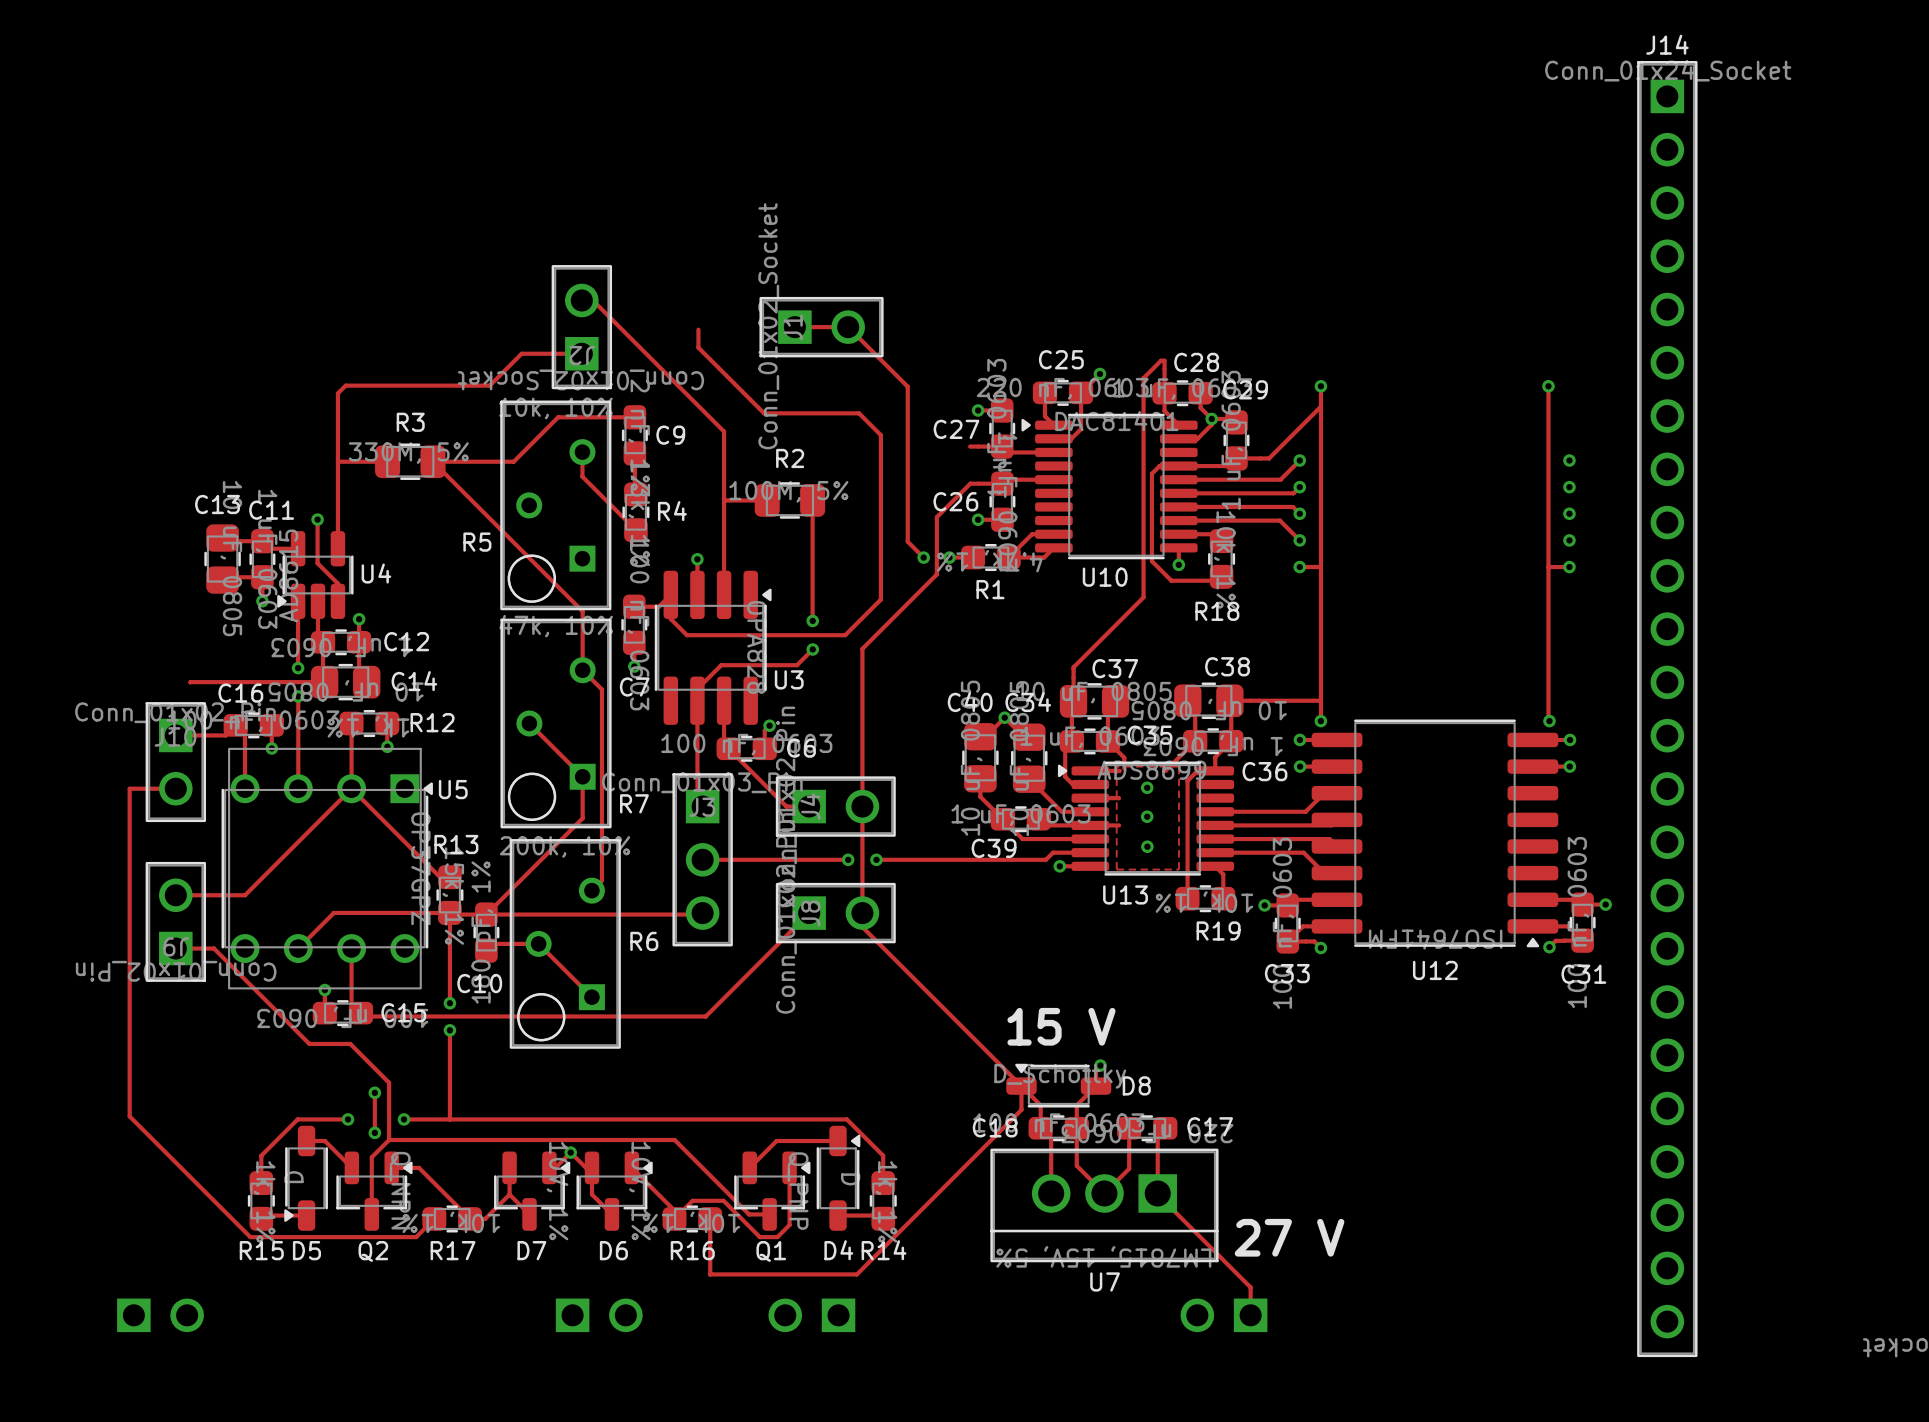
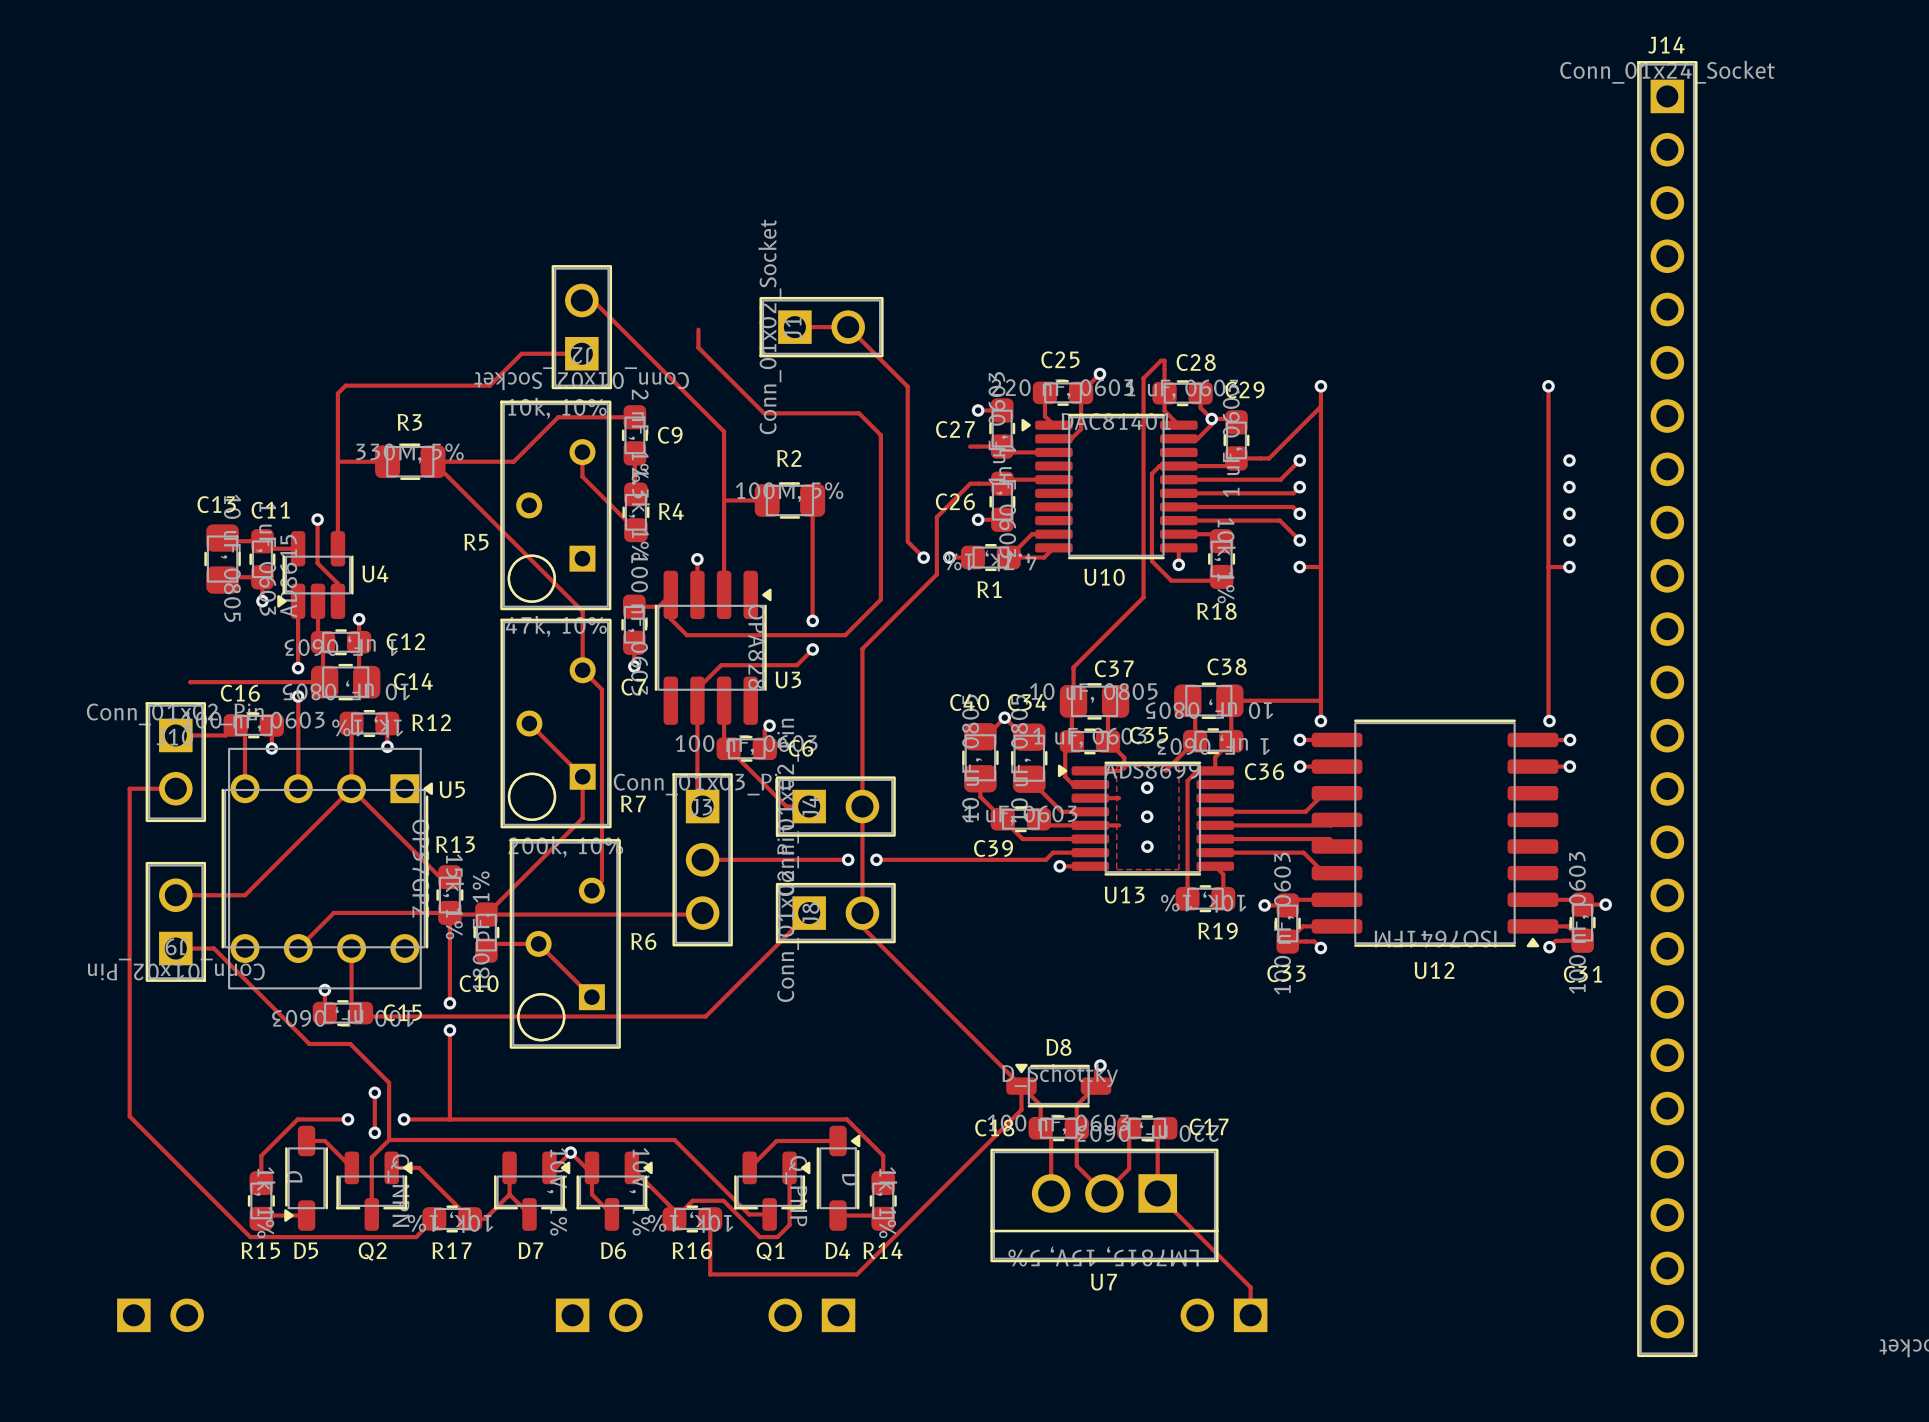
text: 15 V (1061, 1026) -> none
D8 name position: D8 (1136, 1085) -> D8 (1058, 1047)
text: 27 V (1289, 1237) -> none

